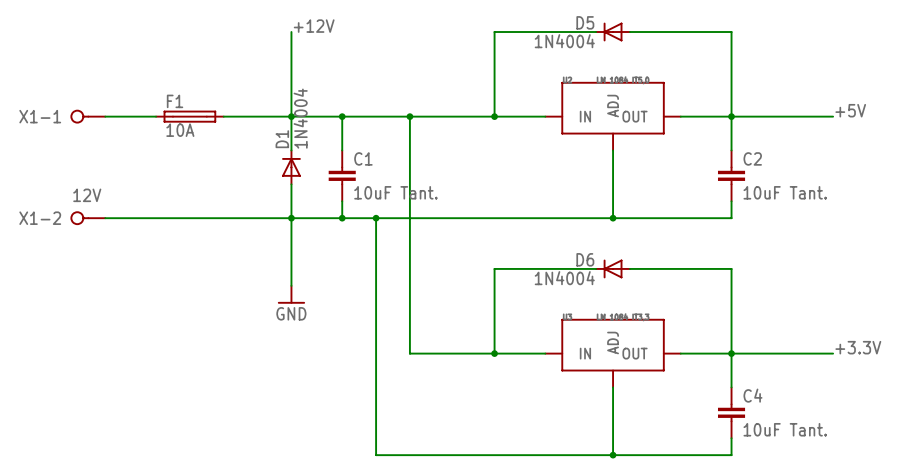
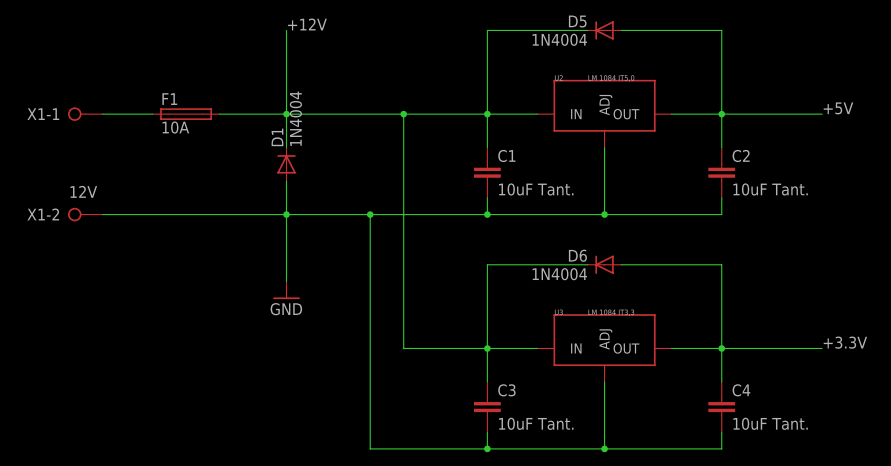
wire: (342, 116) (342, 150) -> (487, 114) (487, 147)
junction: (342, 116) -> none
C1 position: (342, 175) -> (487, 172)
wire: (342, 201) (342, 218) -> (487, 197) (487, 214)
junction: (342, 218) -> none
junction: none -> (487, 214)
wire: none -> (487, 348) (487, 381)
C3: none -> 10uF Tant. (487, 407)
wire: none -> (487, 432) (487, 448)
junction: none -> (487, 448)

